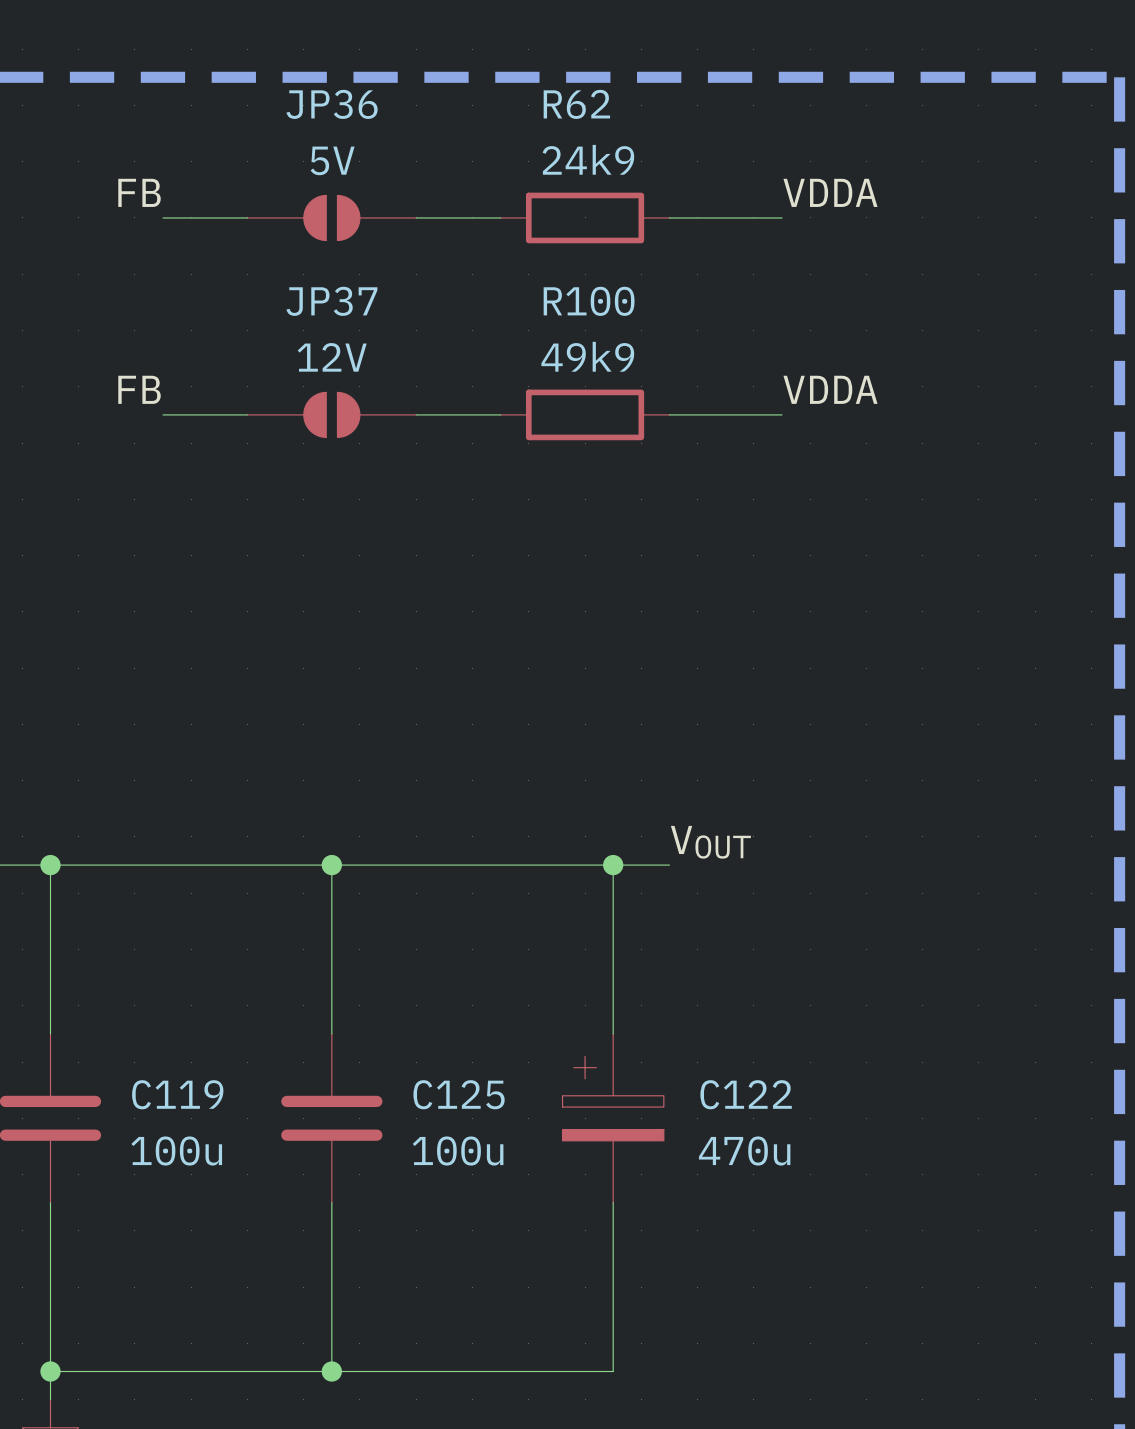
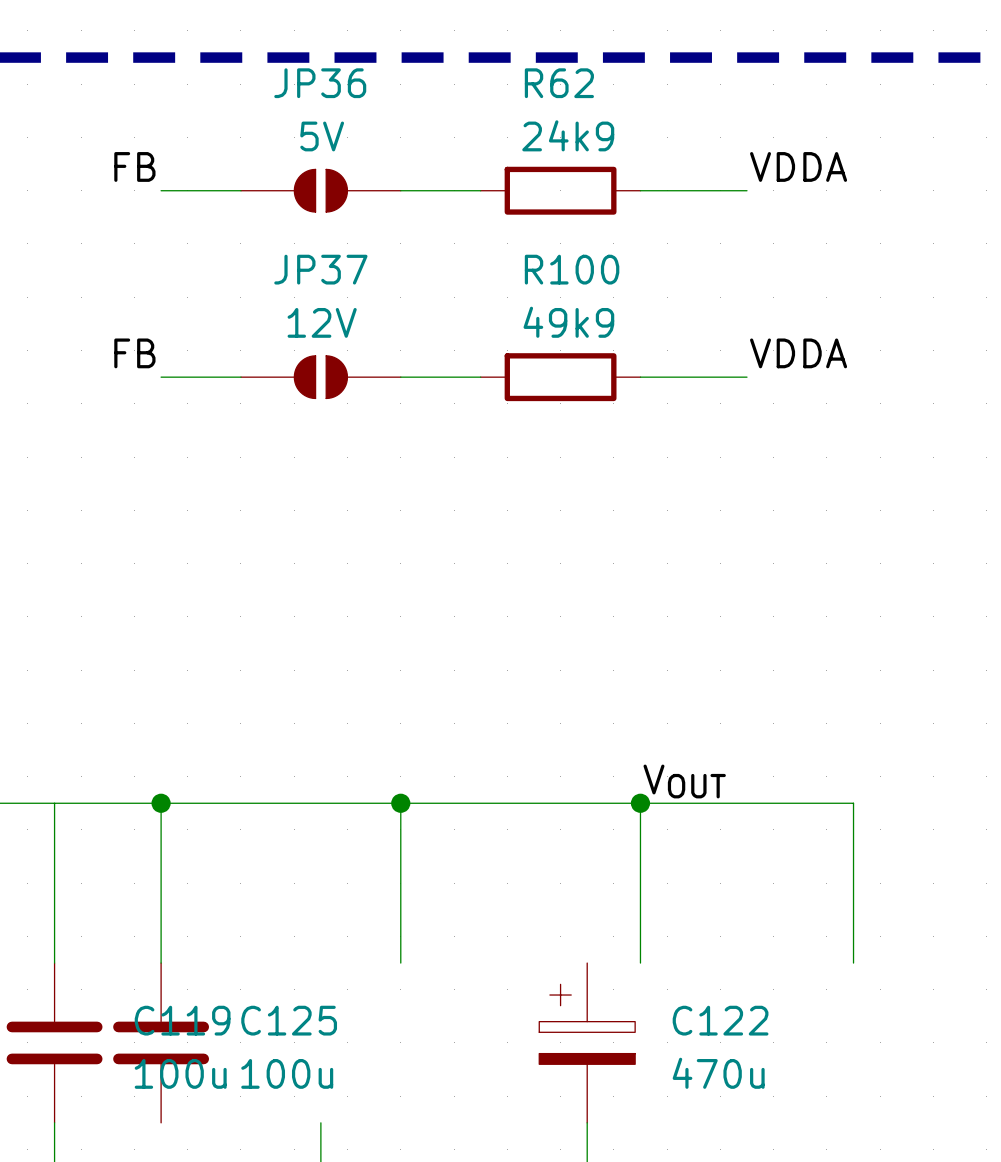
junction: (50, 865) -> none
junction: none -> (161, 803)
wire: (331, 865) (331, 1033) -> (161, 803) (161, 963)
junction: (331, 865) -> none
junction: none -> (400, 803)
wire: (613, 865) (613, 1033) -> (400, 803) (400, 963)
junction position: (613, 865) -> (640, 803)
wire: none -> (640, 963) (640, 803) (853, 803) (853, 963)
C125 position: (331, 1118) -> (161, 1042)

